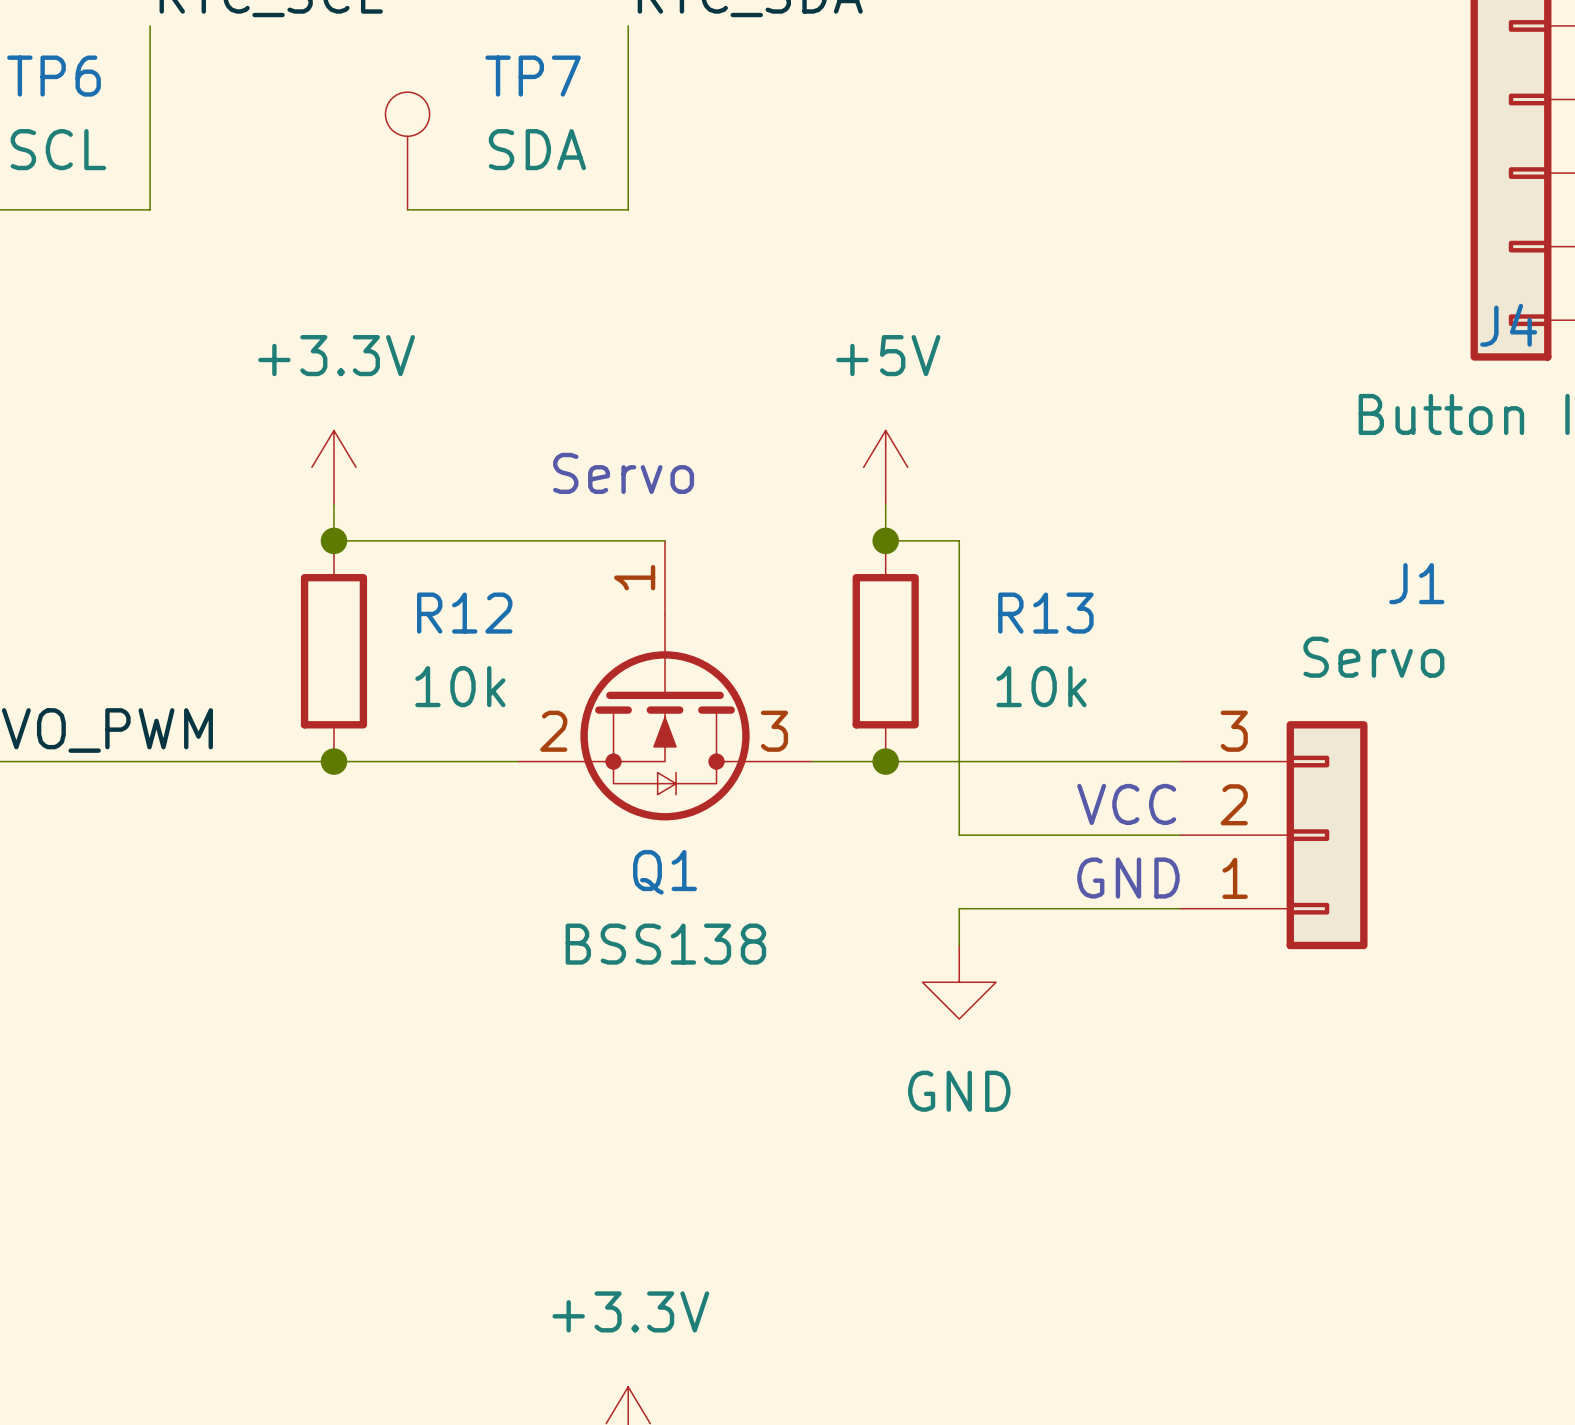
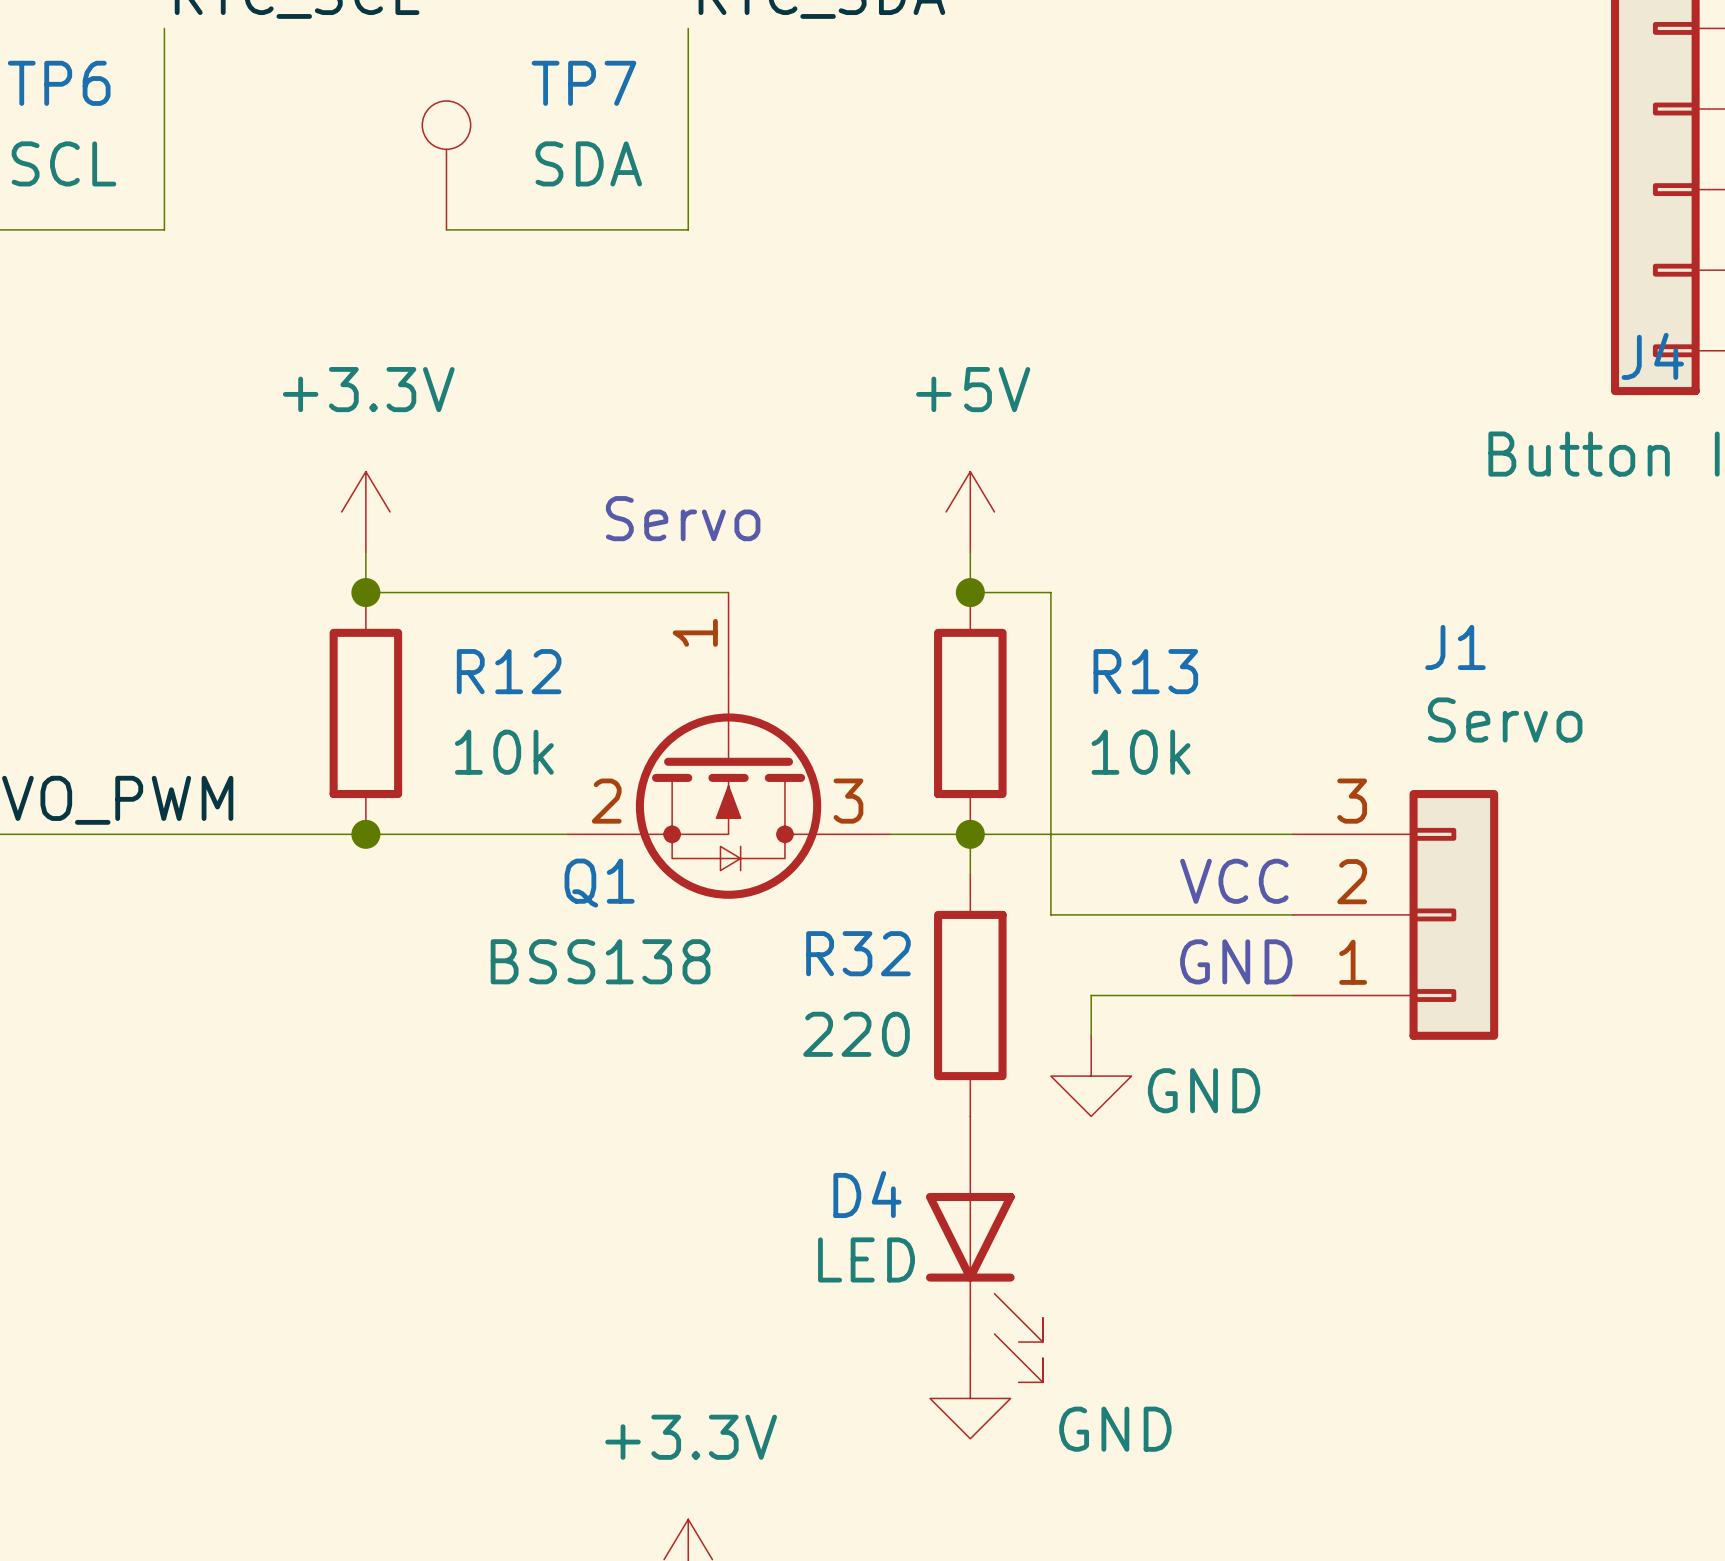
J1 name position: J1 (1416, 583) -> J1 (1455, 647)
wire: none -> (970, 834) (970, 874)
Q1 name position: Q1 (665, 872) -> Q1 (599, 883)
R32: none -> 220 (970, 995)
wire: (996, 908) (959, 908) (959, 945) -> (1091, 995) (1091, 1035)
Q1 value position: BSS138 (665, 944) -> BSS138 (600, 961)
power symbol position: GND (959, 982) -> GND (1091, 1076)
power symbol text position: GND (959, 1091) -> GND (1204, 1090)
D4: none -> LED (984, 1249)
power symbol: none -> GND (970, 1398)

